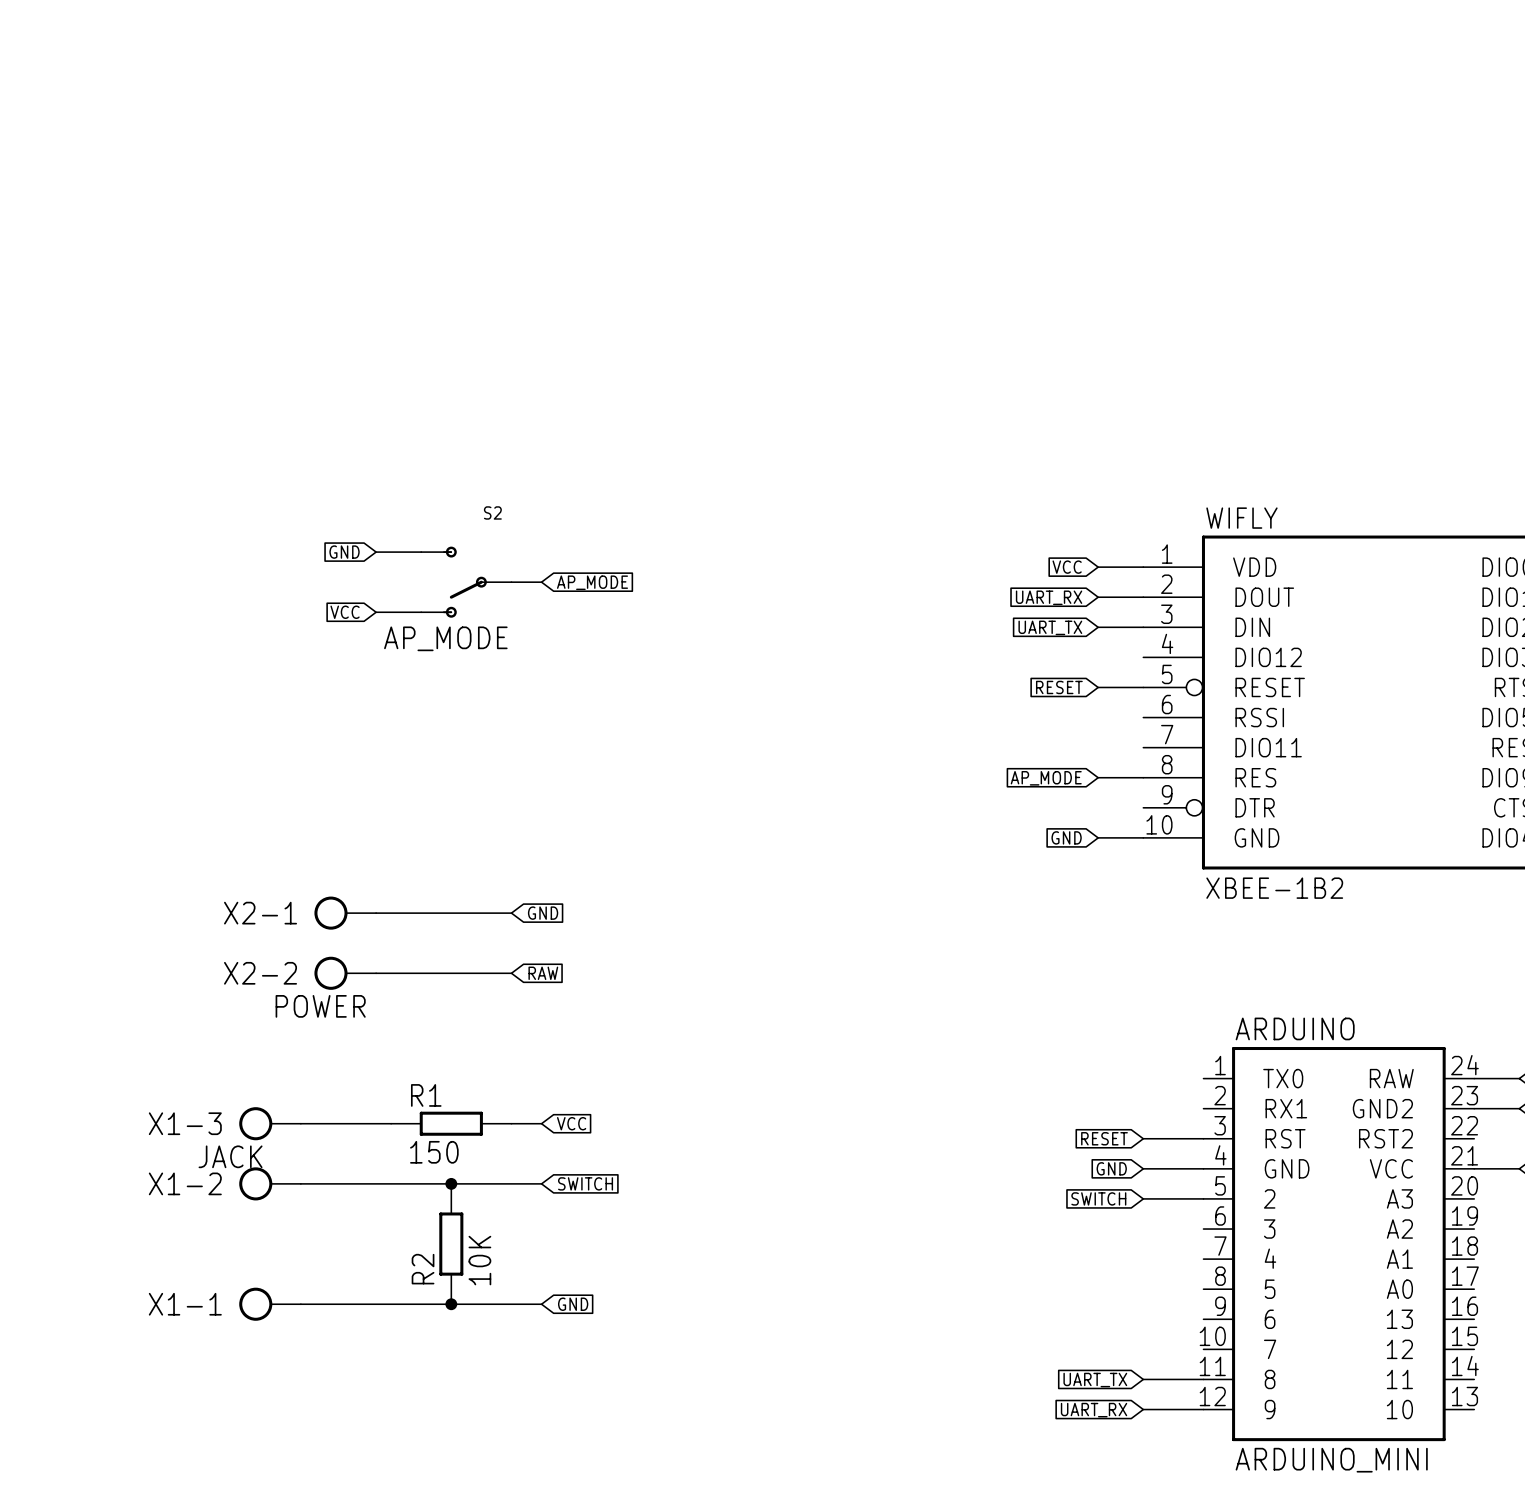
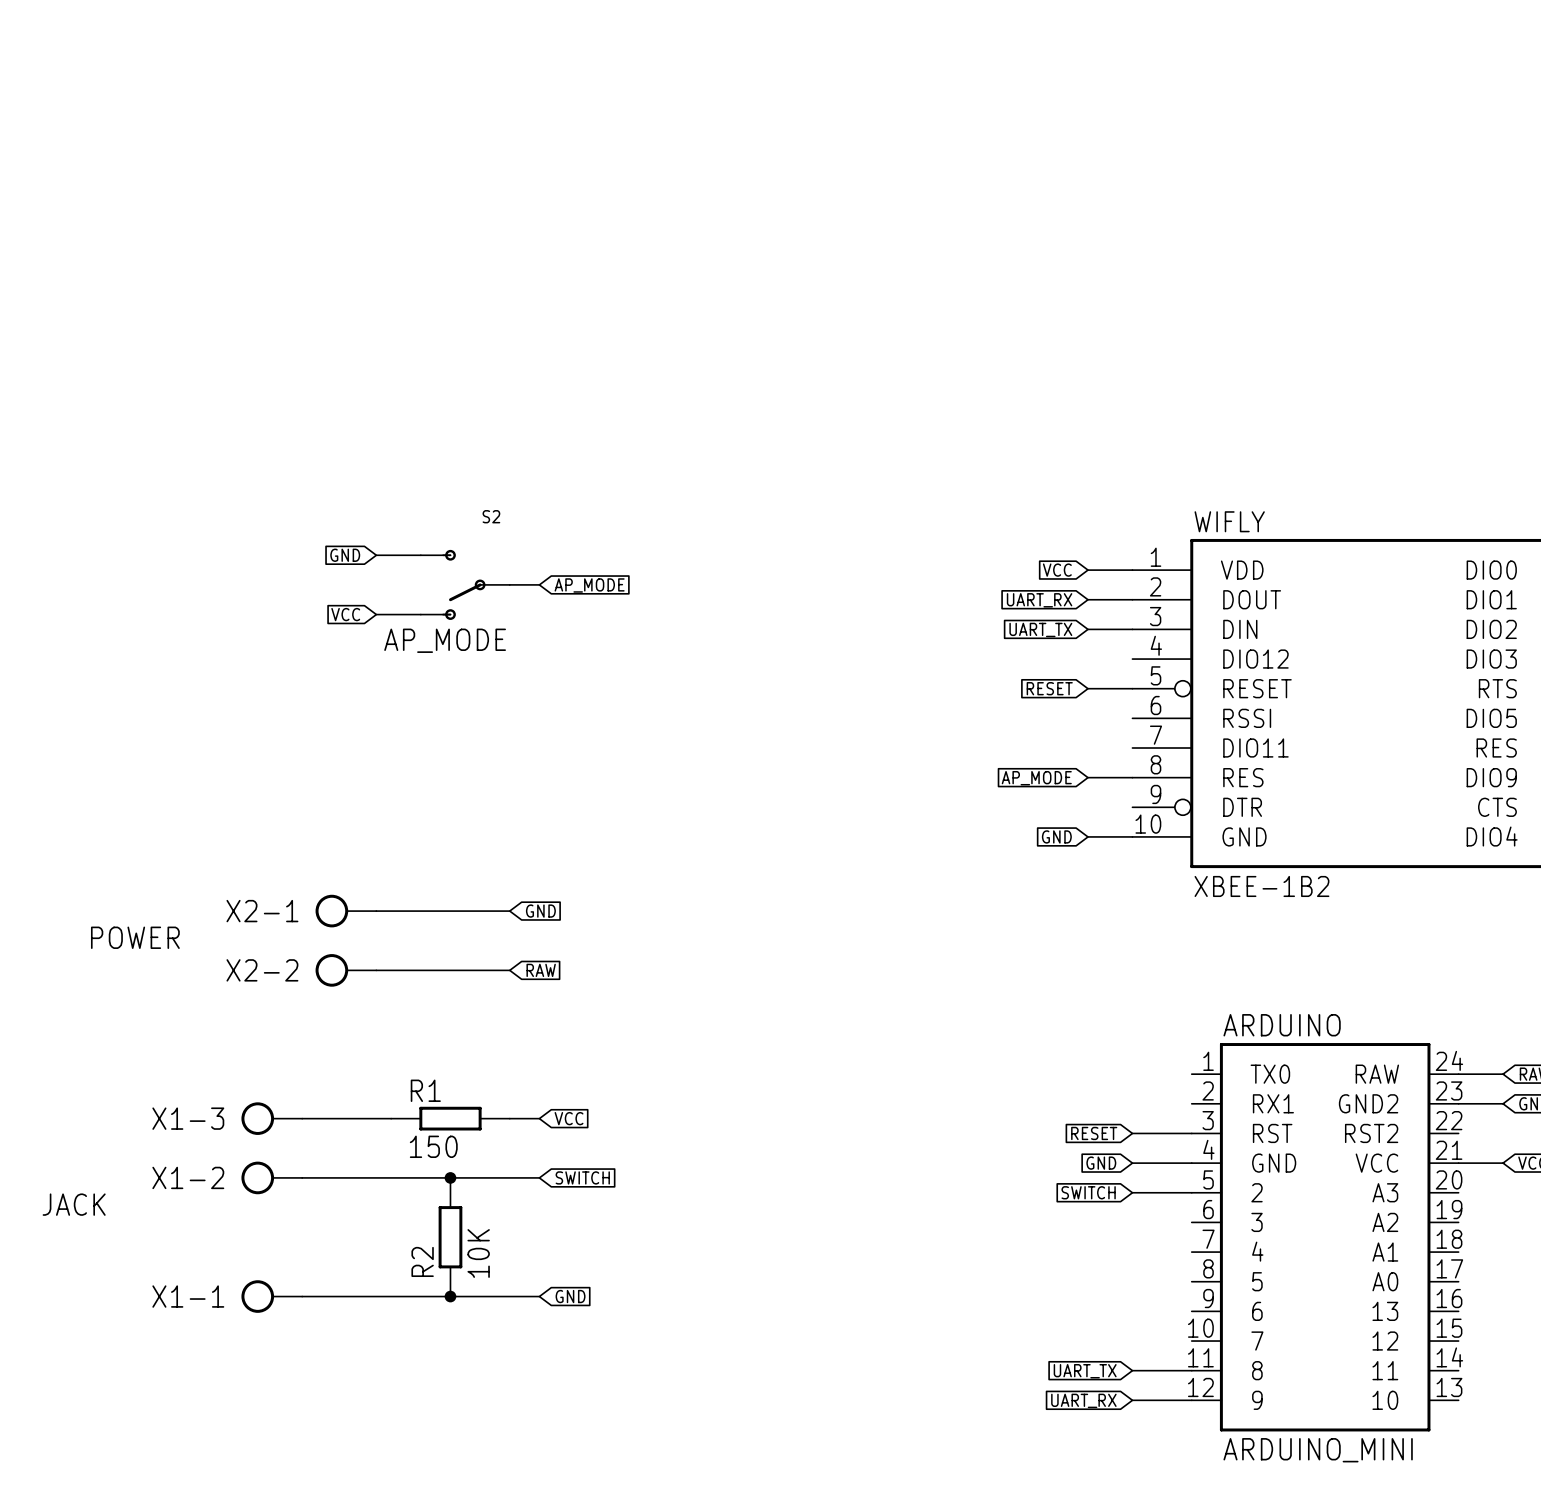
X2-2 value position: POWER (320, 1006) -> POWER (135, 937)
X1-3 value position: JACK (230, 1156) -> JACK (74, 1204)

